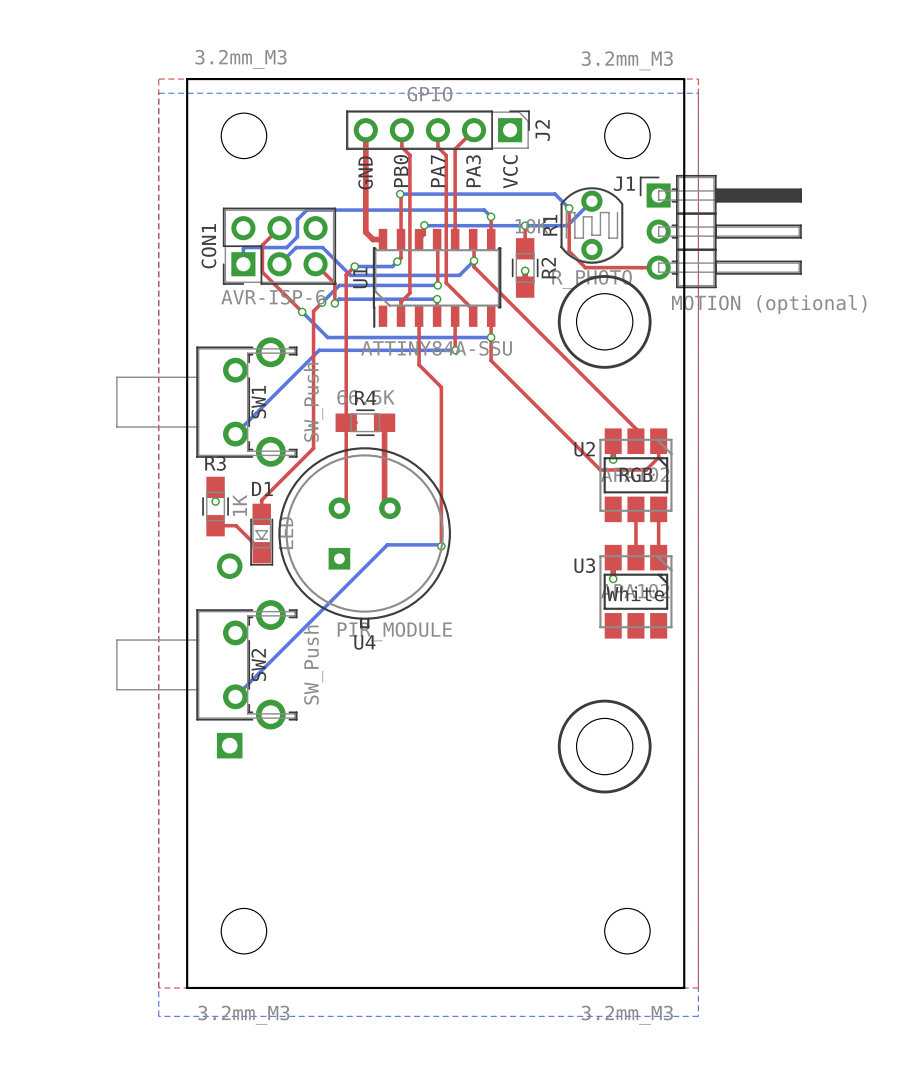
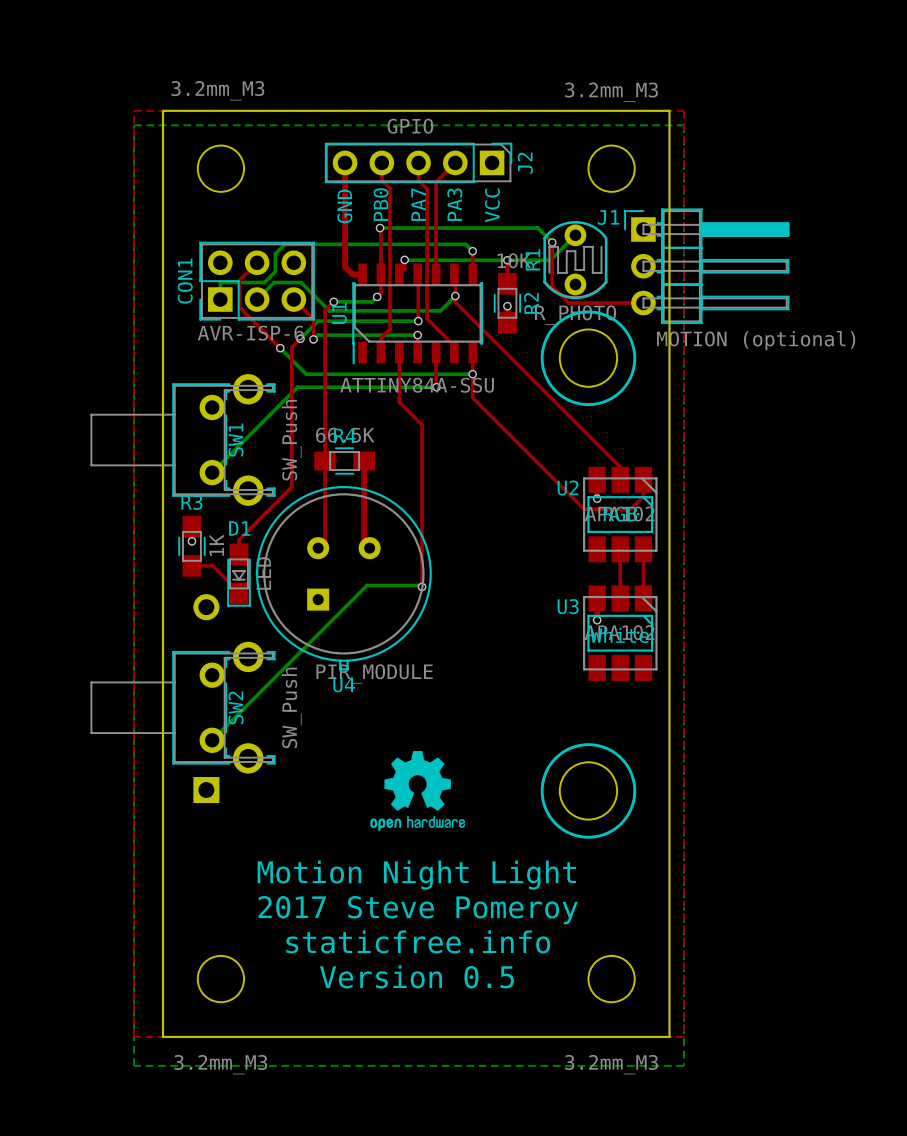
drawing: none -> [370, 750, 466, 832]
text: none -> Motion Night Light (416, 875)
text: none -> 2017 Steve Pomeroy (418, 910)
text: none -> staticfree.info (418, 941)
text: none -> Version 0.5 (416, 976)

